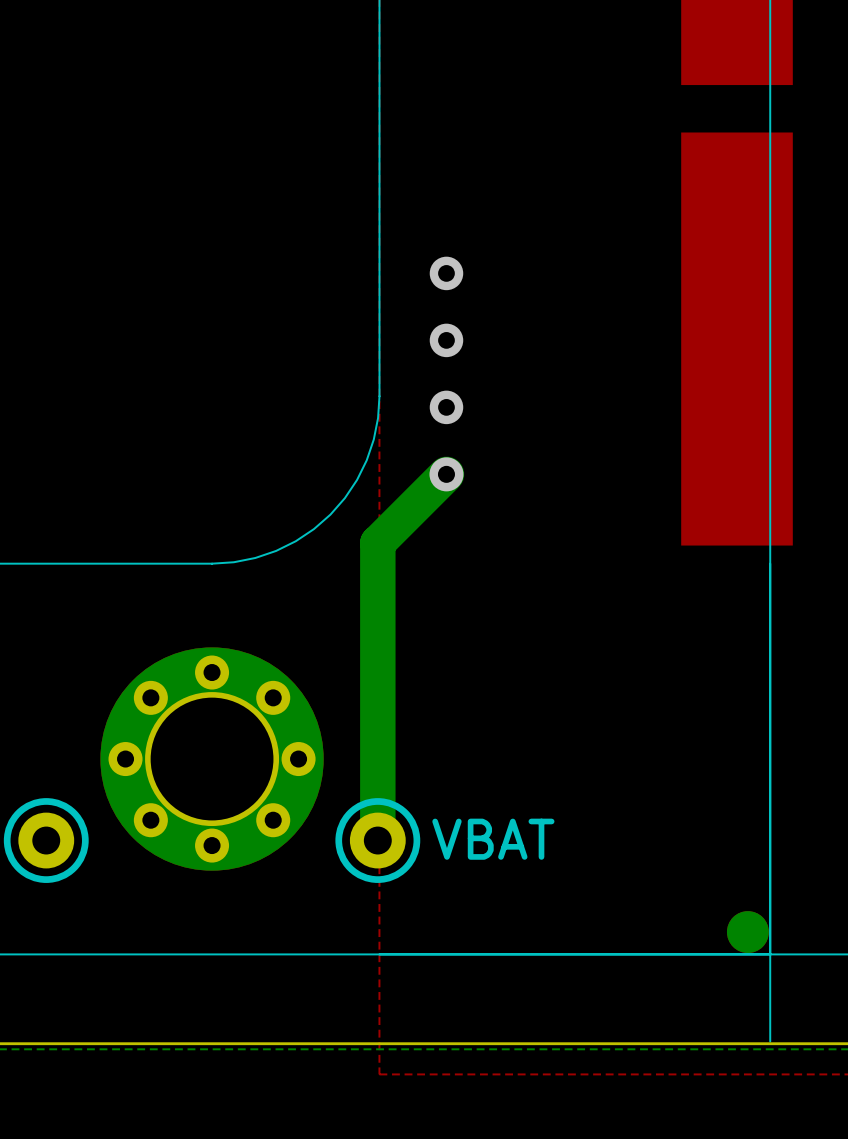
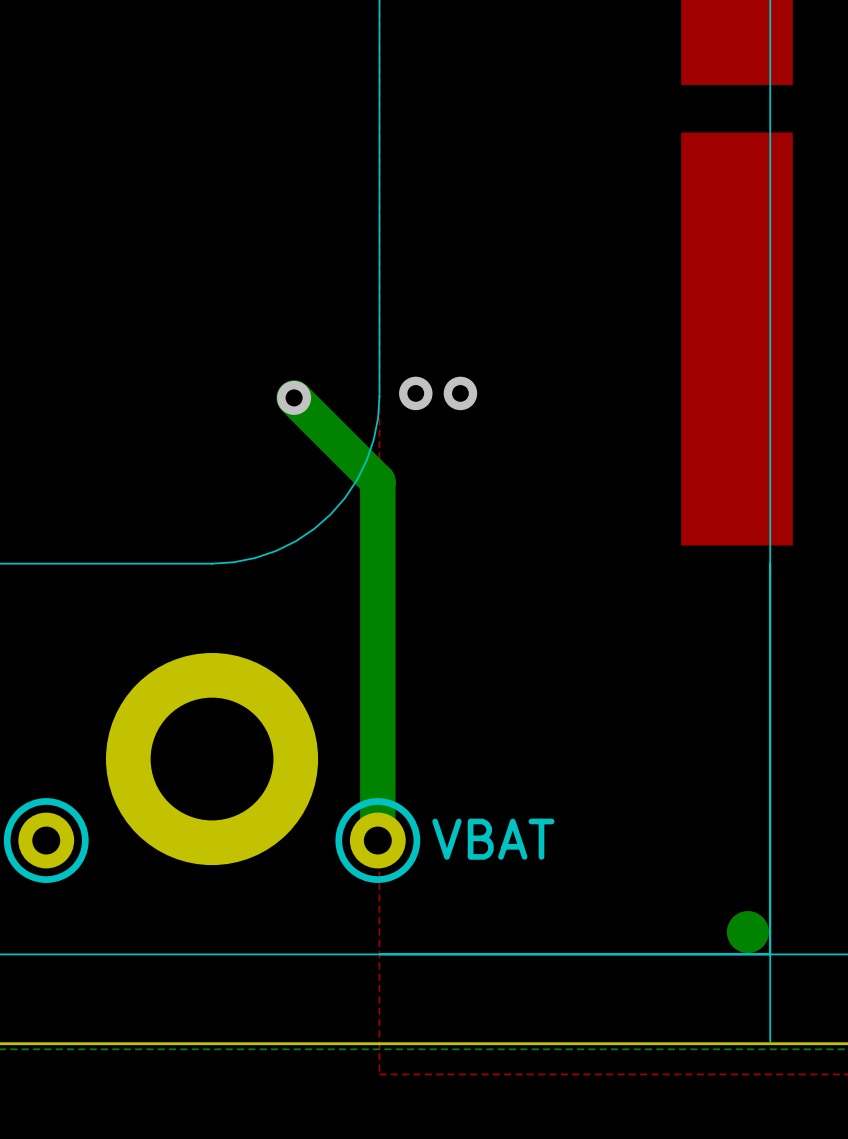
via: (446, 273) -> none
via: (446, 340) -> none
via: none -> (415, 393)
via: none -> (460, 393)
via: none -> (294, 397)
via: (446, 407) -> none
bottom track: (446, 474) (377, 543) -> (294, 397) (377, 481) (377, 543)
via: (446, 474) -> none
part footprint: [100, 647, 324, 871] -> [105, 652, 319, 866]

